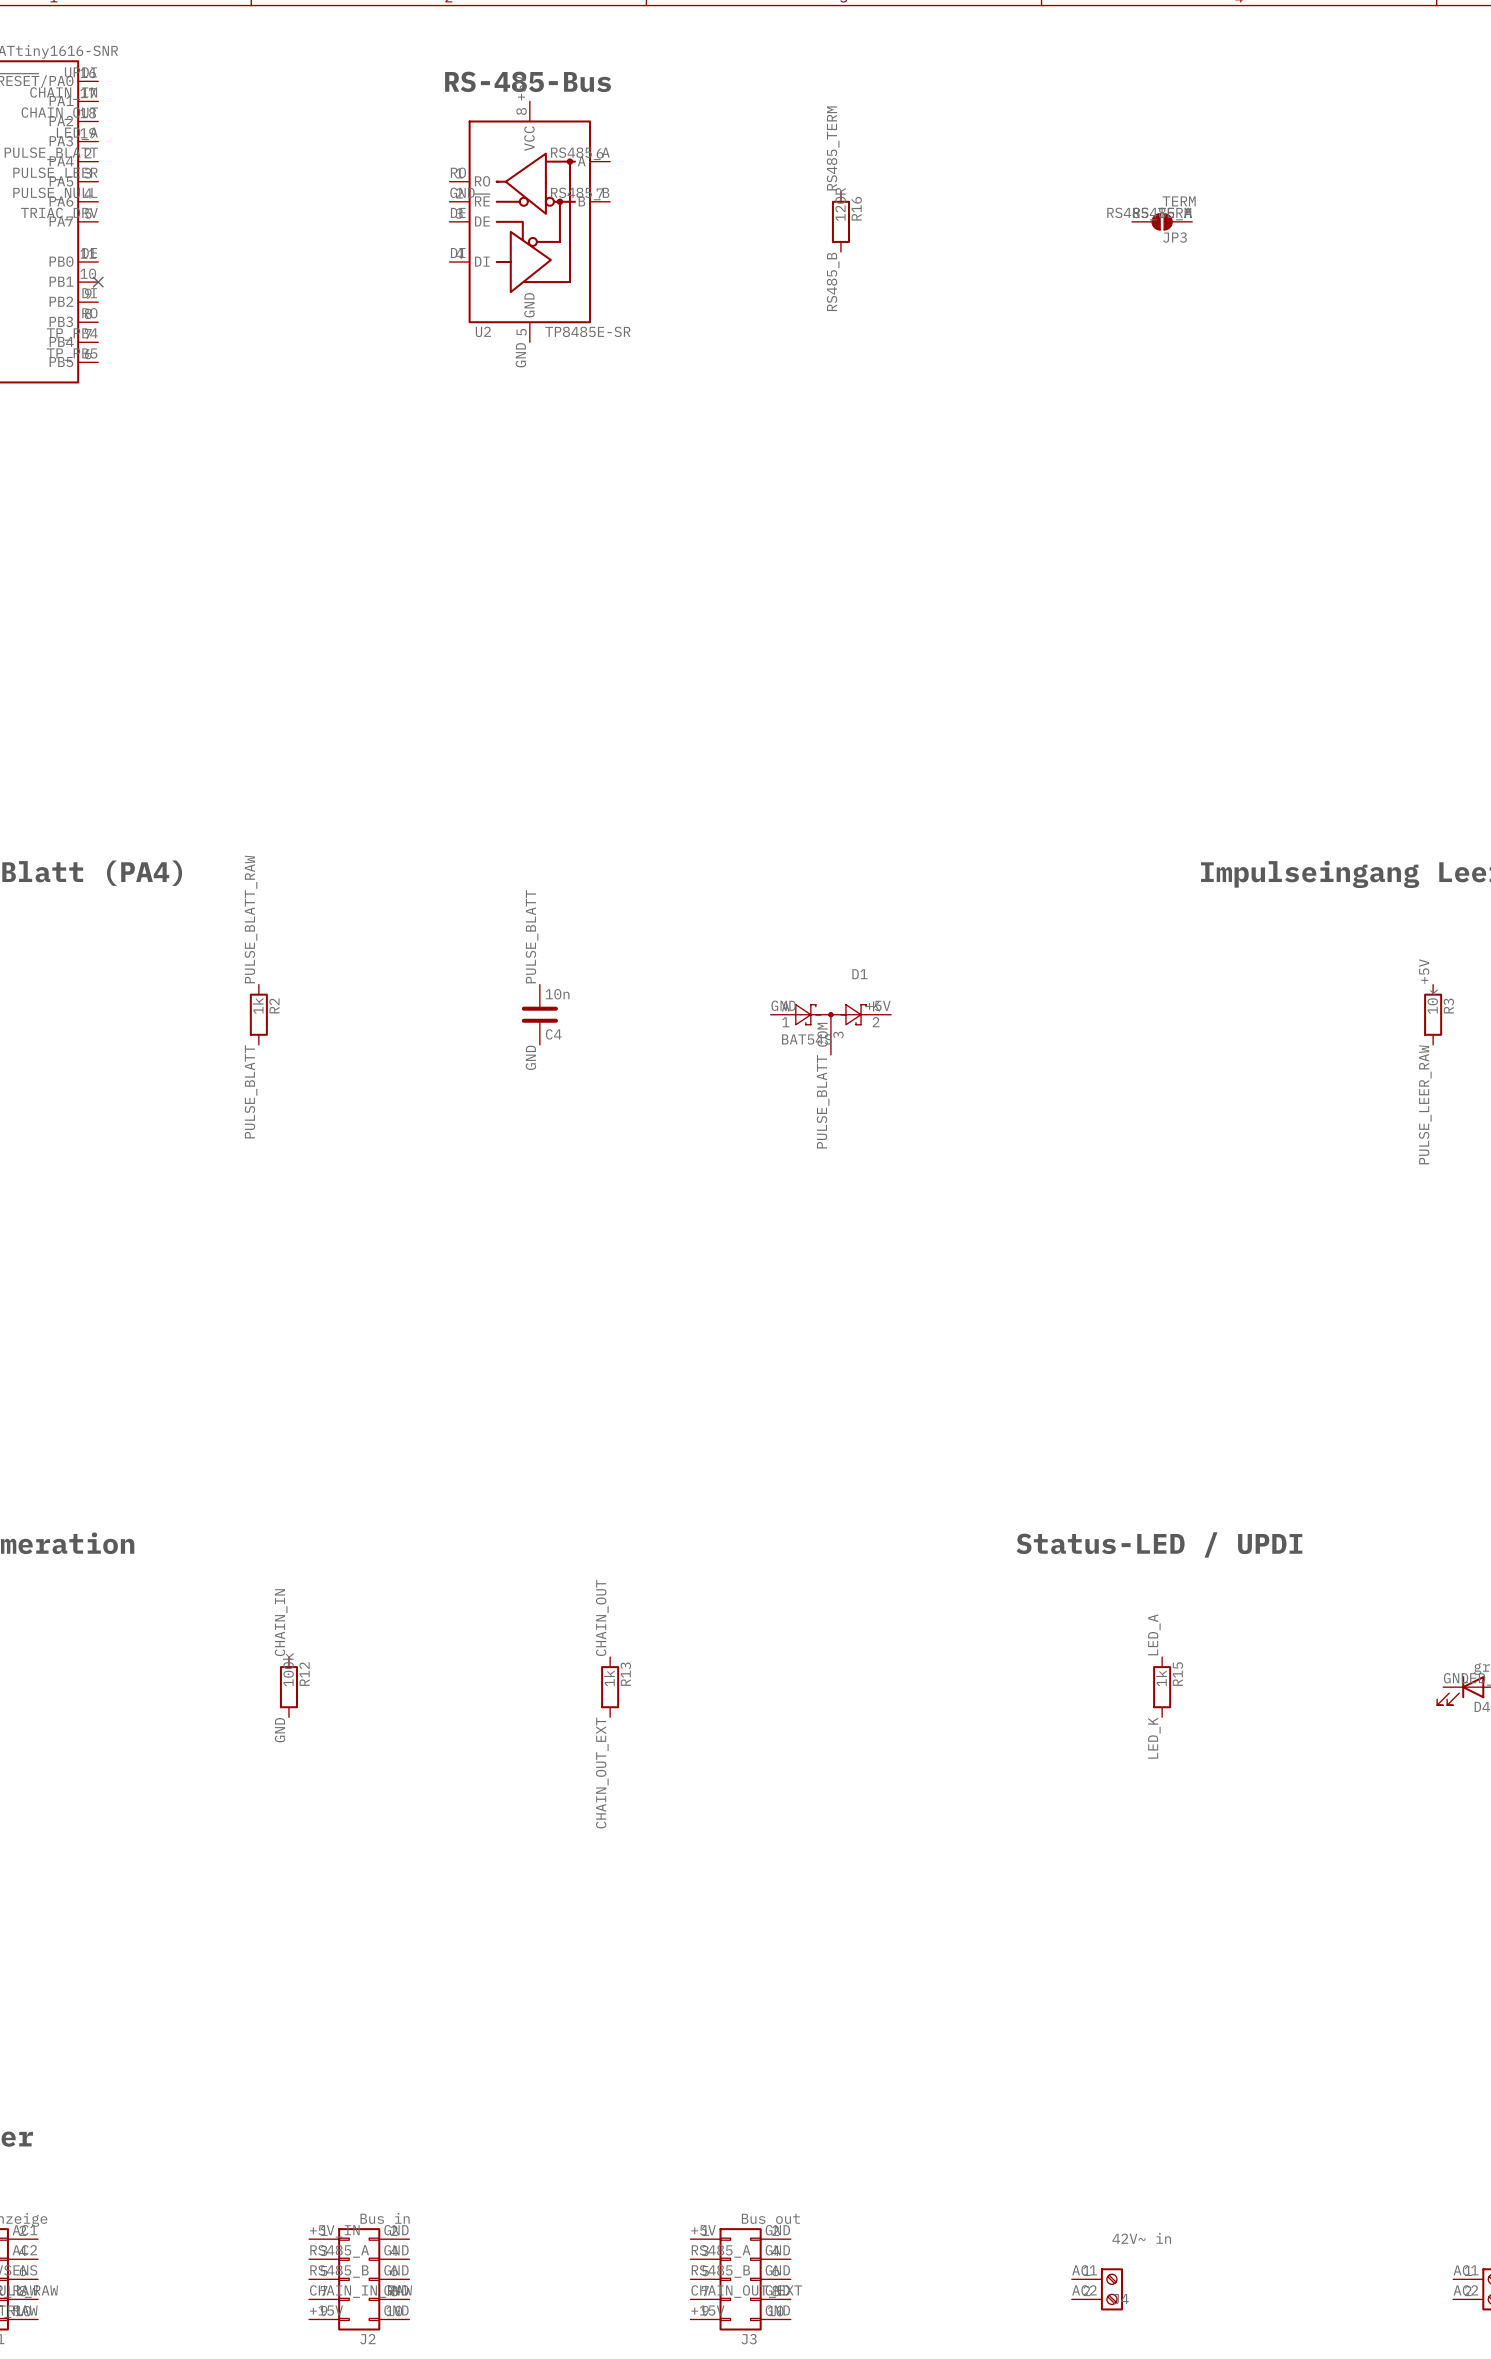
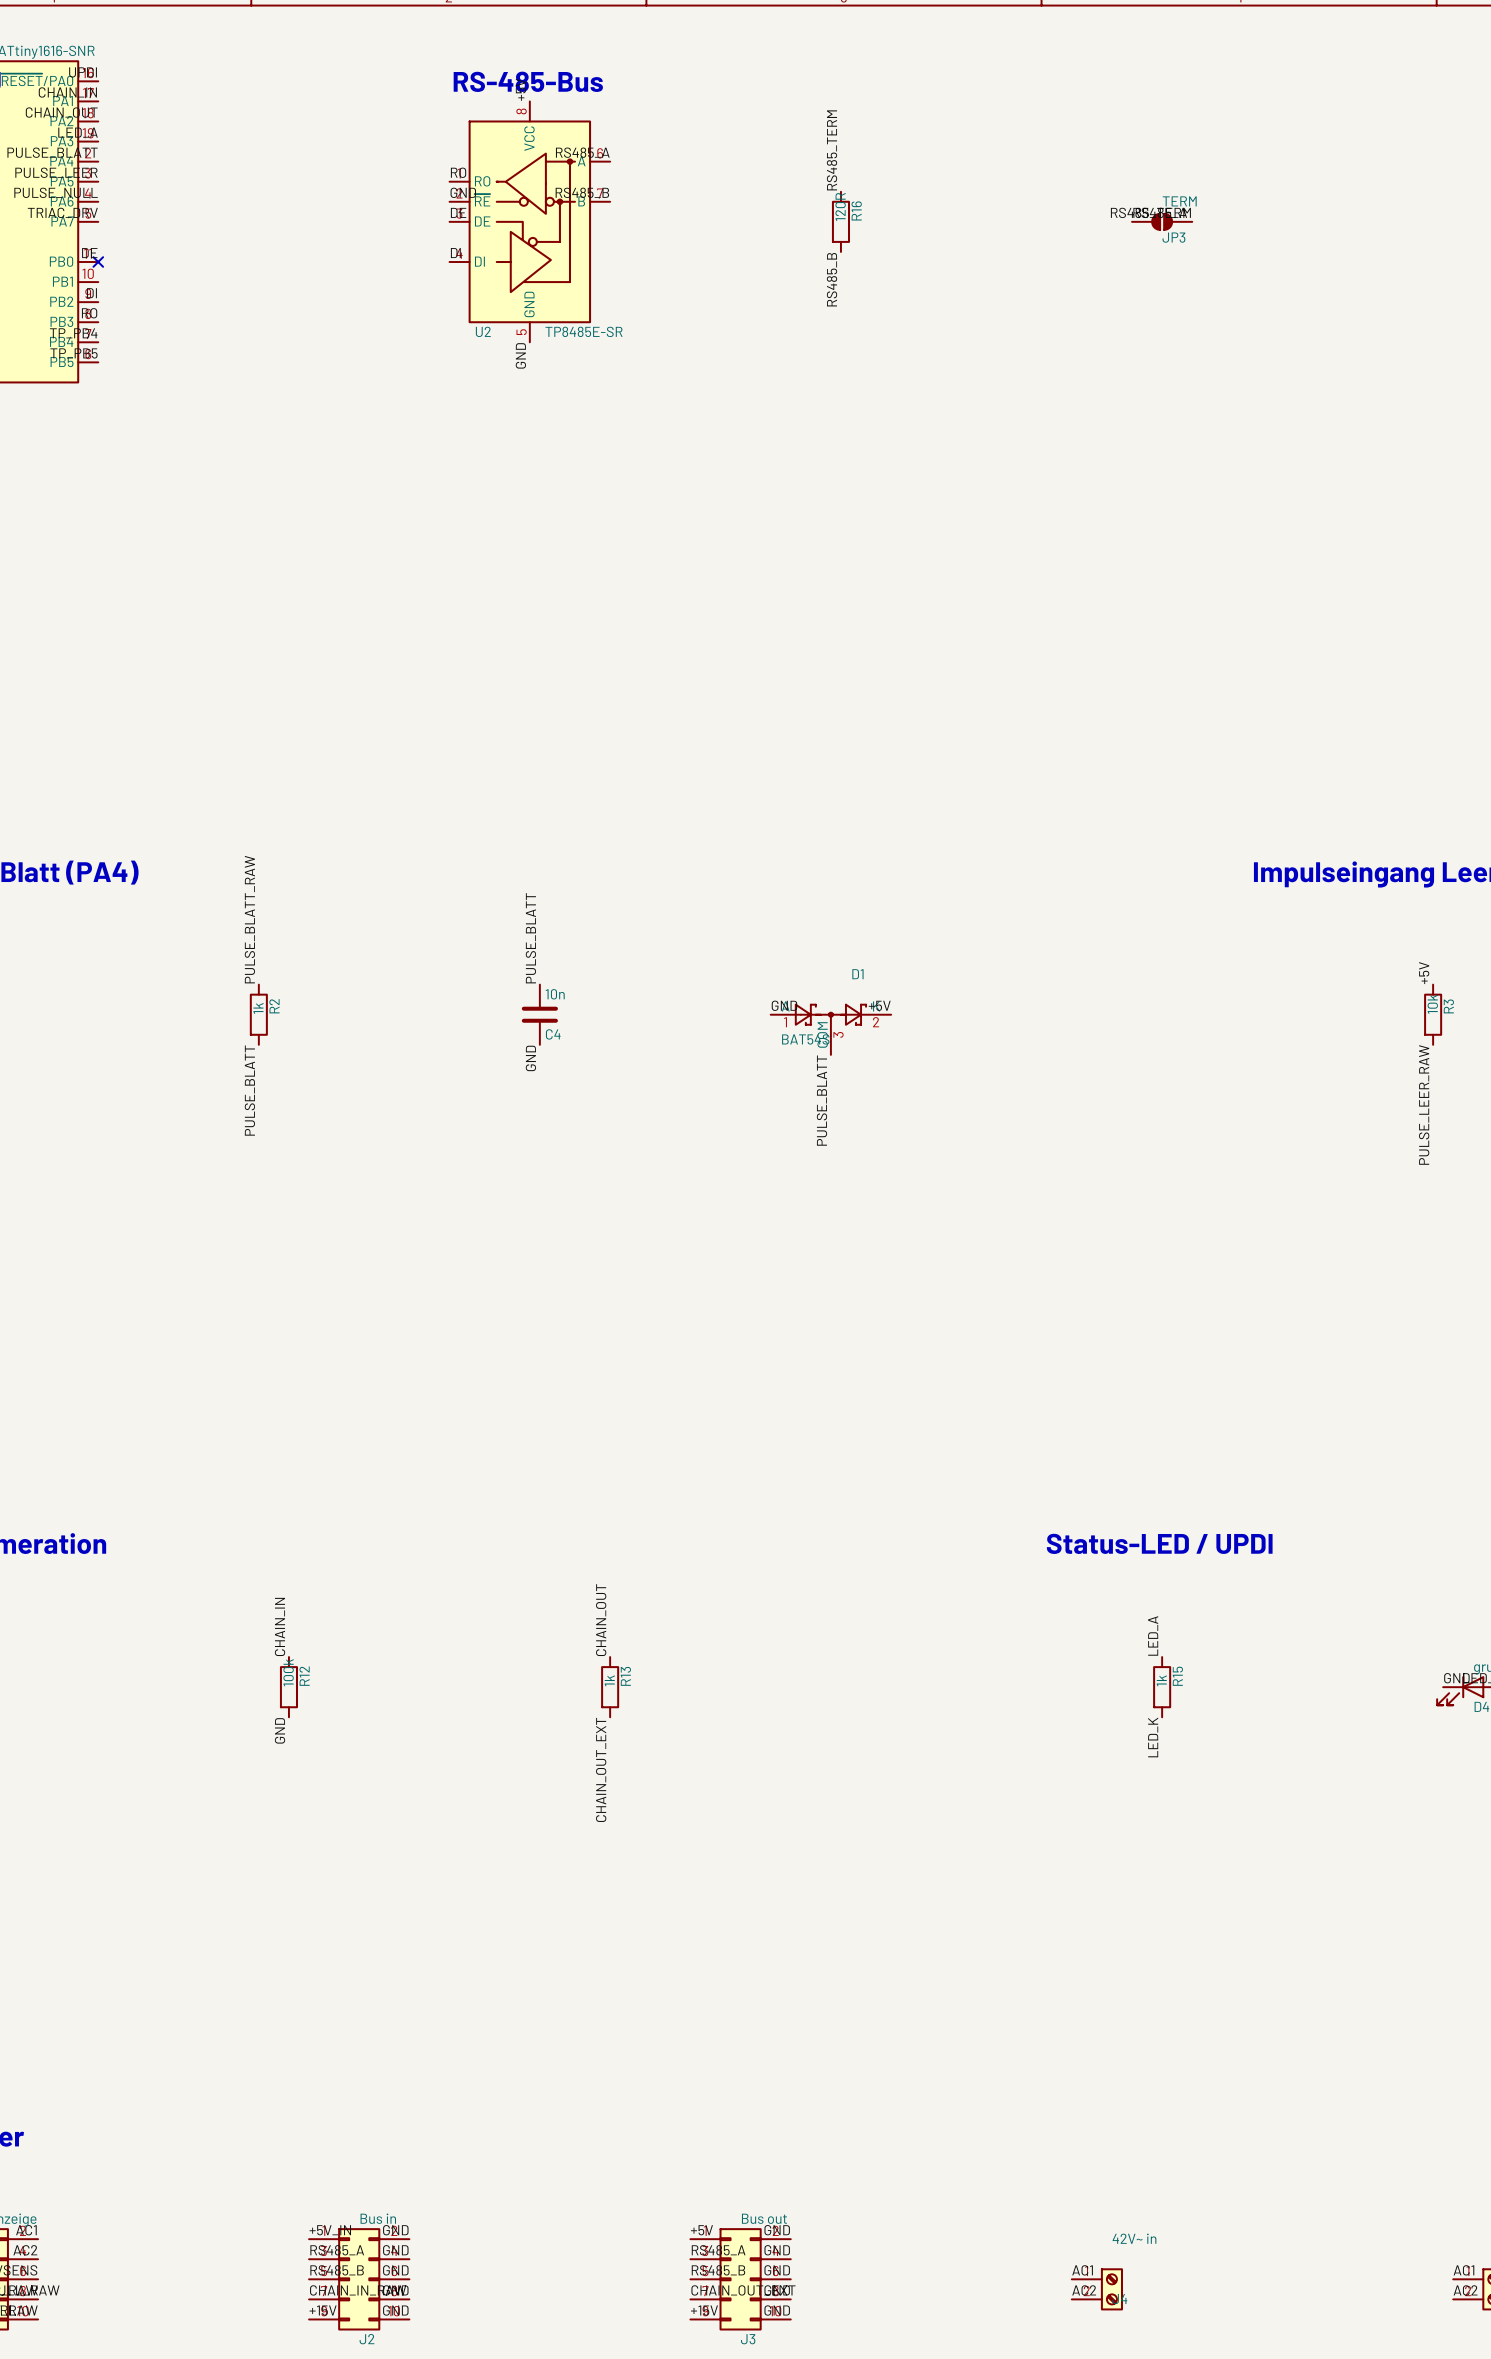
no-connect mark position: (98, 282) -> (98, 262)

